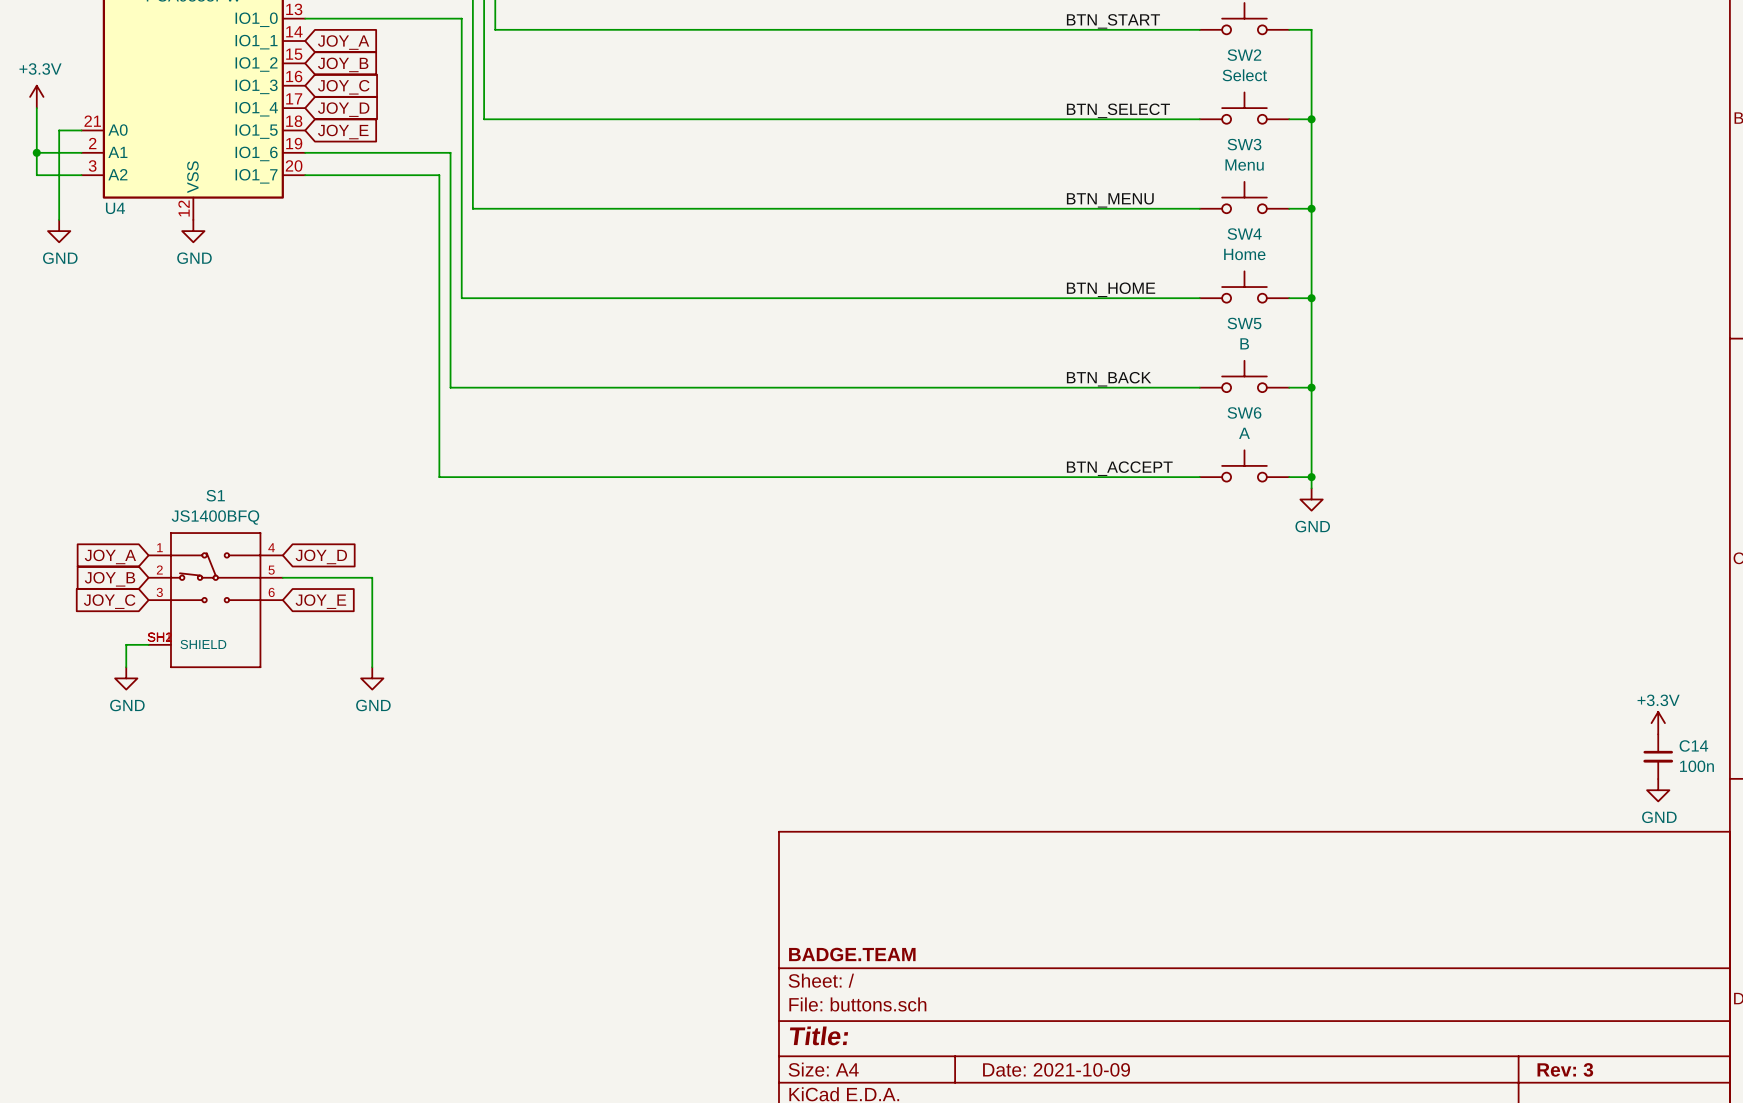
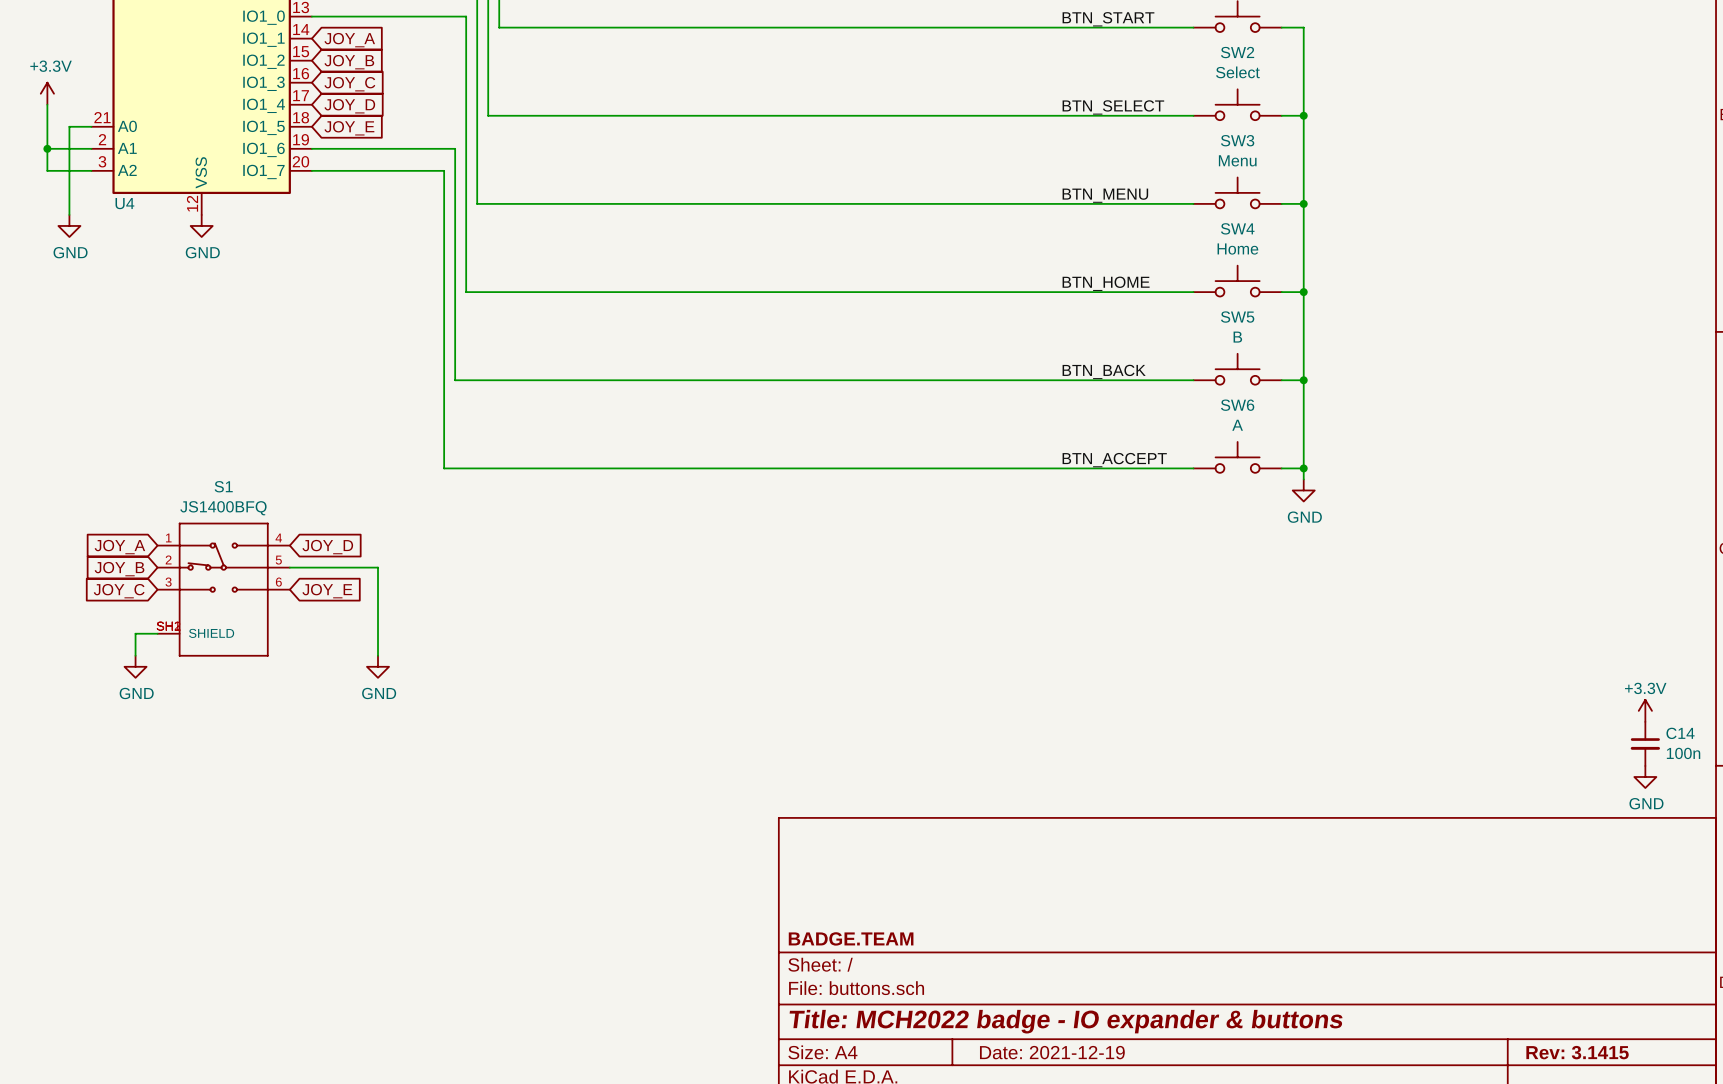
title block: Title: (819, 1035) -> Title: MCH2022 badge - IO expander & buttons (1066, 1021)
title block: Date: 2021-10-09 (1056, 1069) -> Date: 2021-12-19 (1052, 1052)
title block: Rev: 3 (1565, 1069) -> Rev: 3.1415 (1577, 1052)

